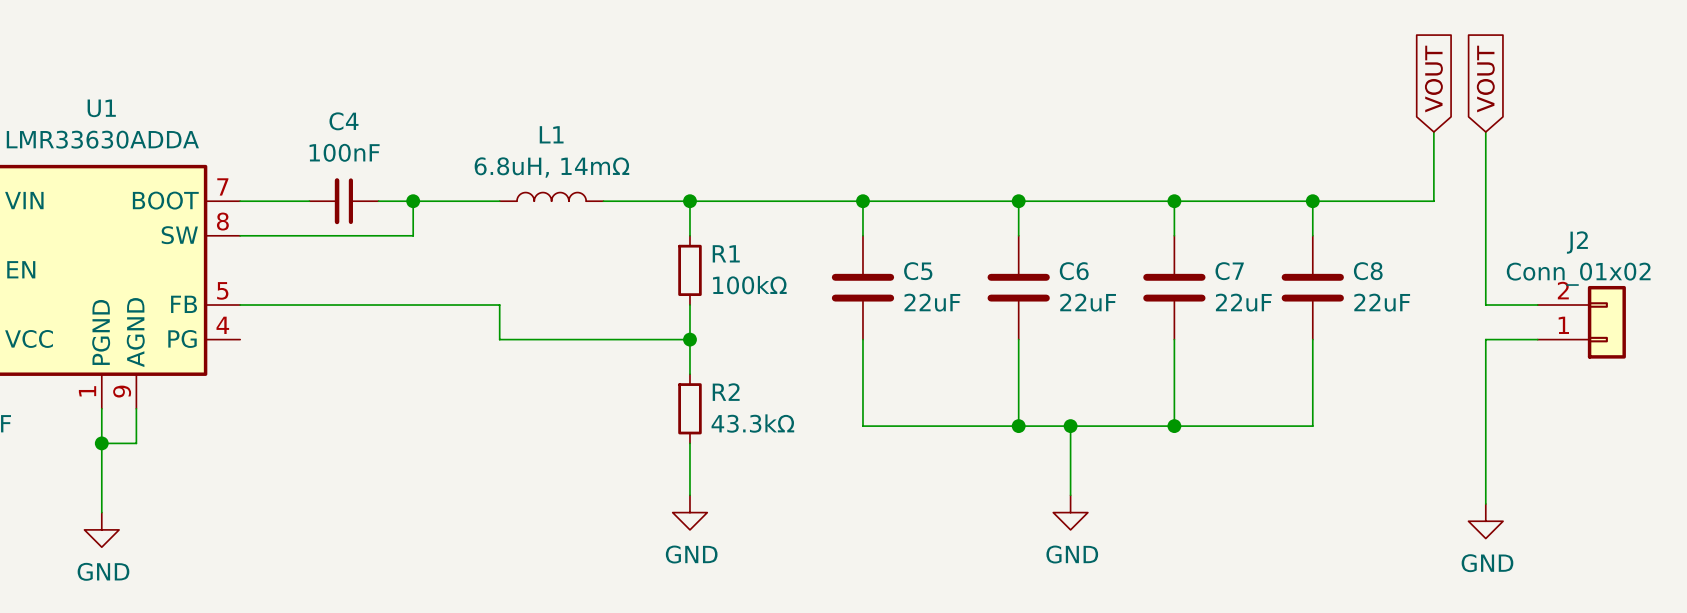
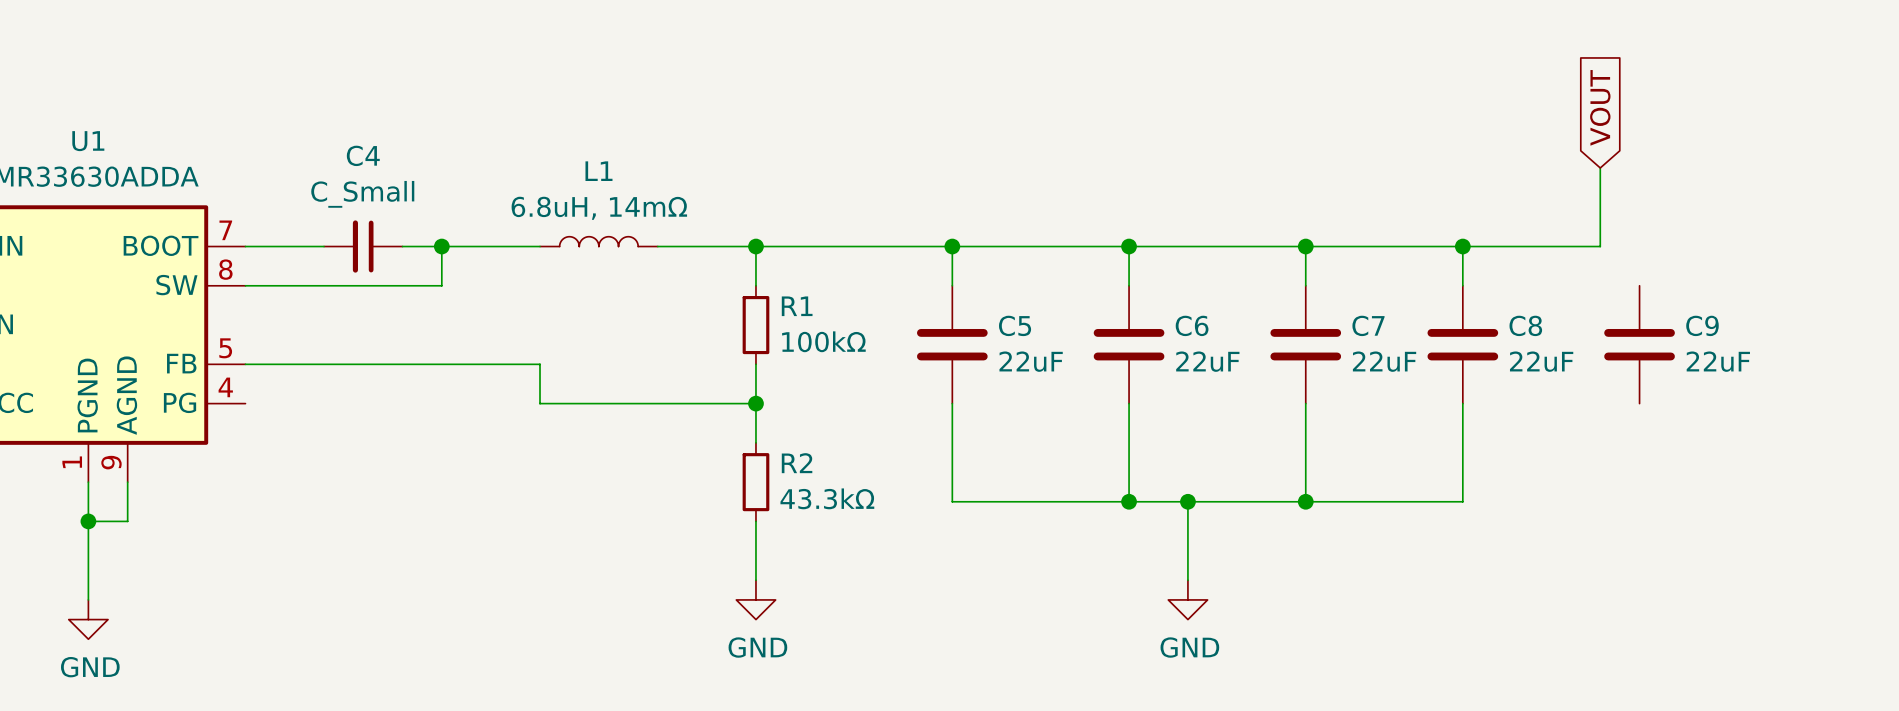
global label: VOUT (1485, 79) -> none
wire: (1485, 132) (1485, 305) (1537, 305) -> none
C4 value: 100nF (344, 152) -> C_Small (362, 194)
C9: none -> 22uF (1639, 344)
J2: Conn_01x02 (1581, 322) -> none
wire: (1537, 339) (1485, 339) (1485, 503) -> none
power symbol: GND (1485, 521) -> none

